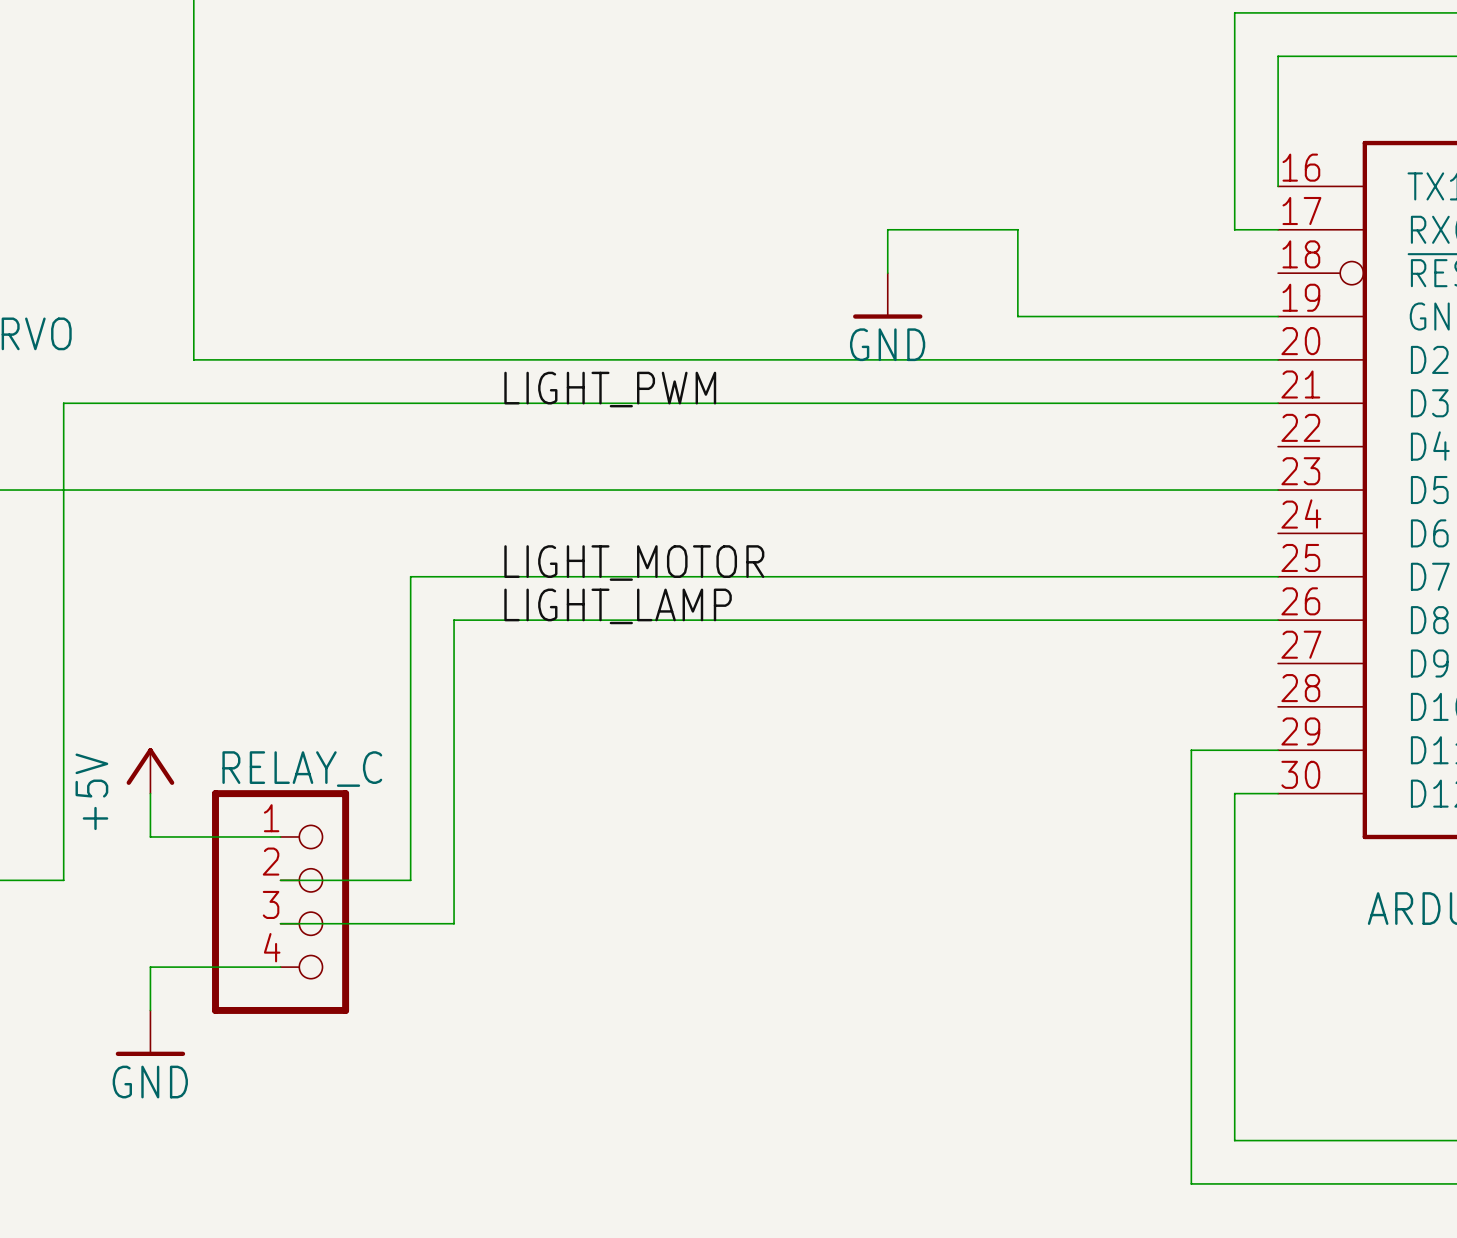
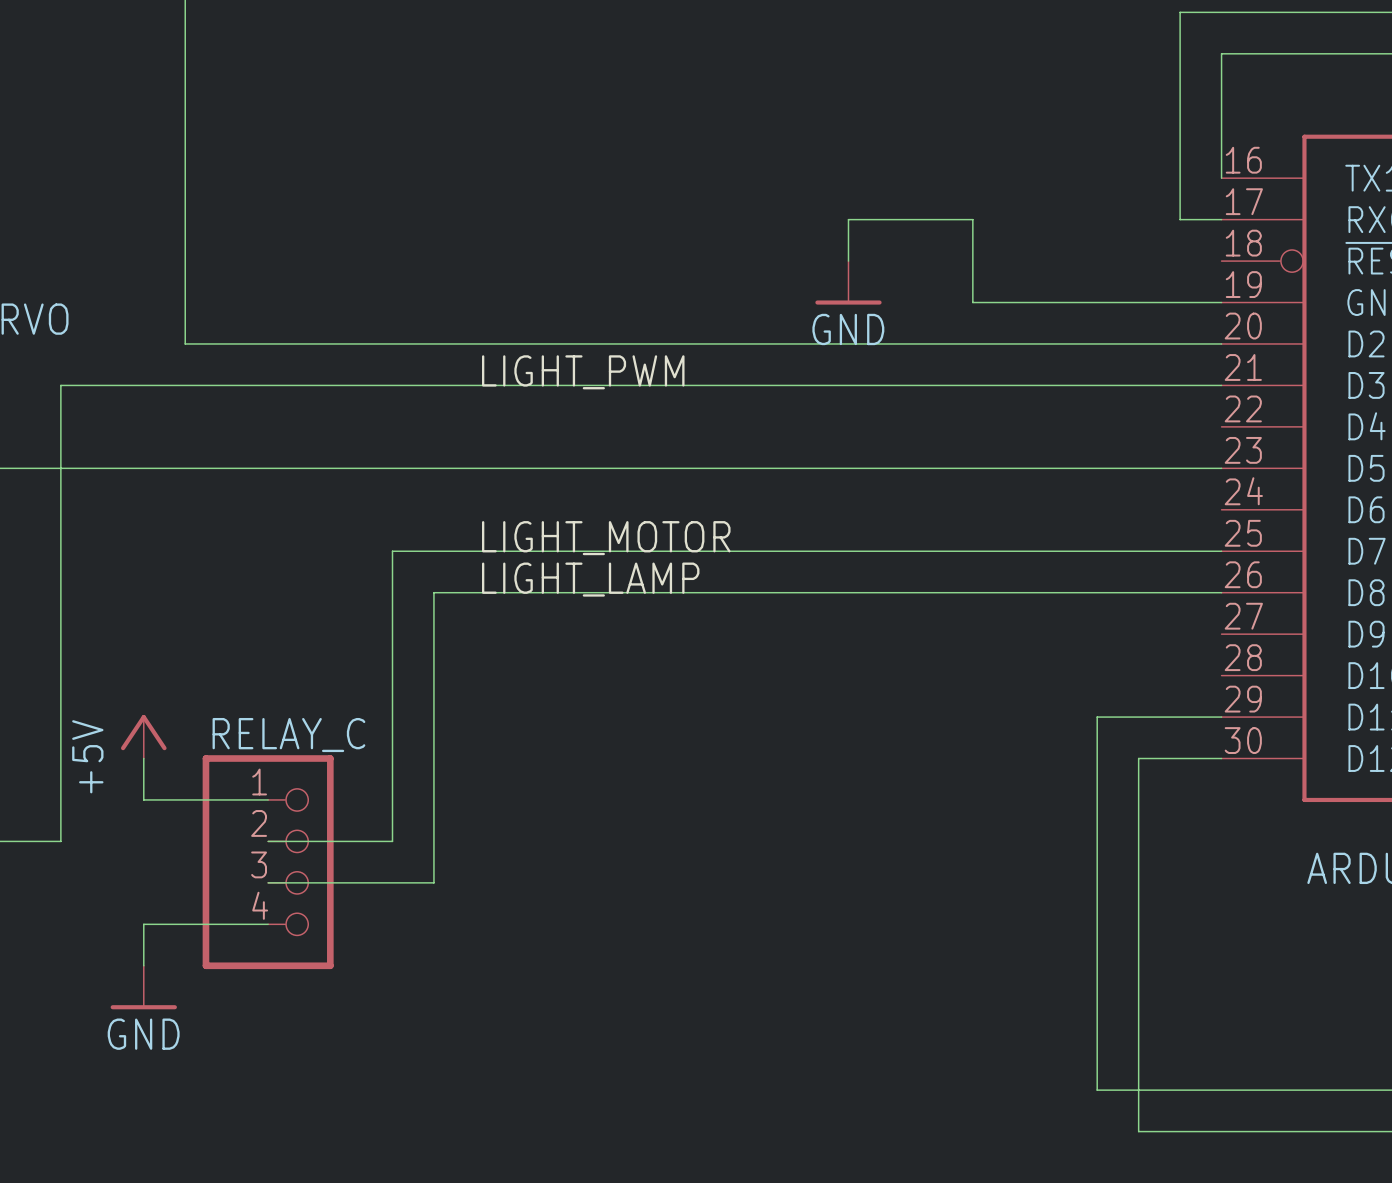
wire: (1191, 750) (1191, 793) -> (1180, 758) (1138, 758)
wire: (1234, 793) (1234, 1140) -> (1138, 717) (1097, 717) (1097, 1090) (1180, 1090)

